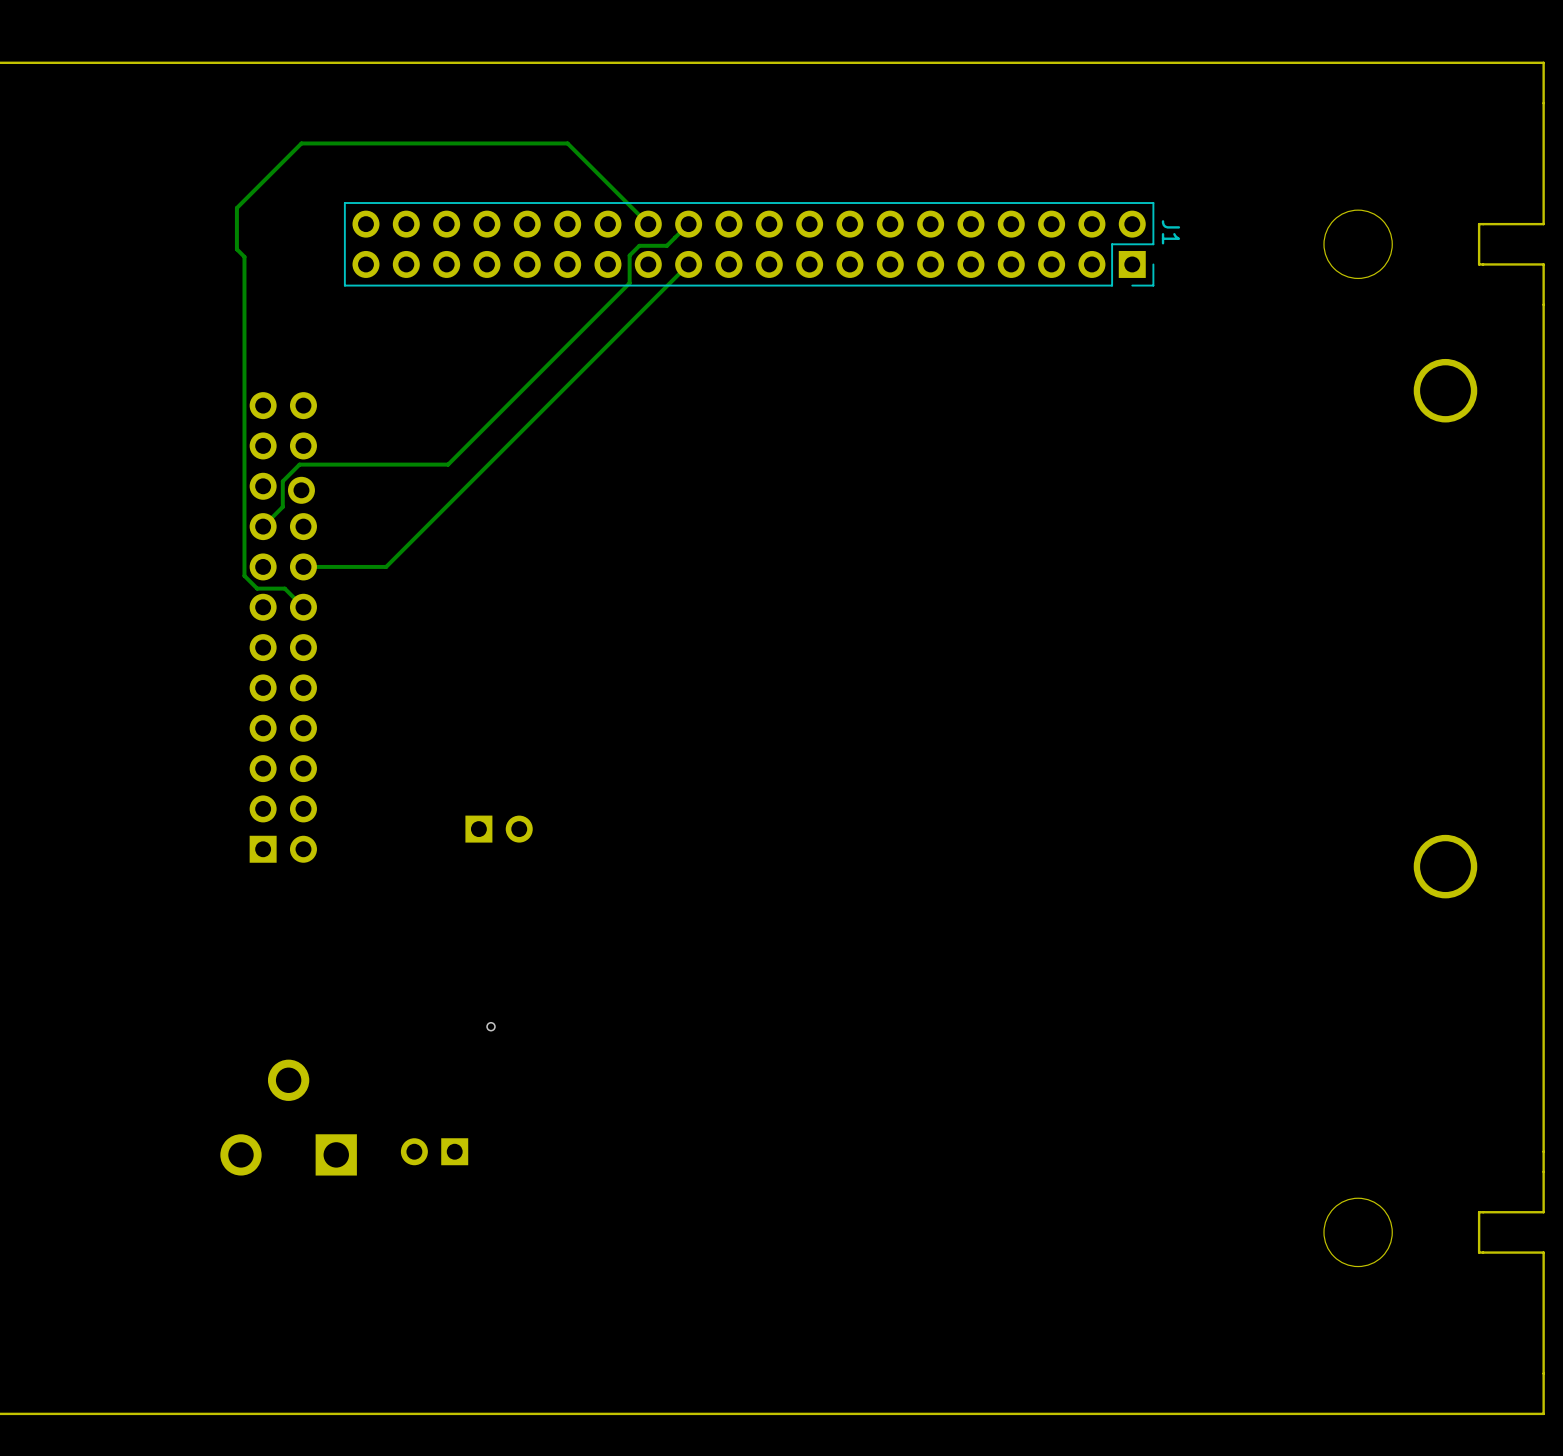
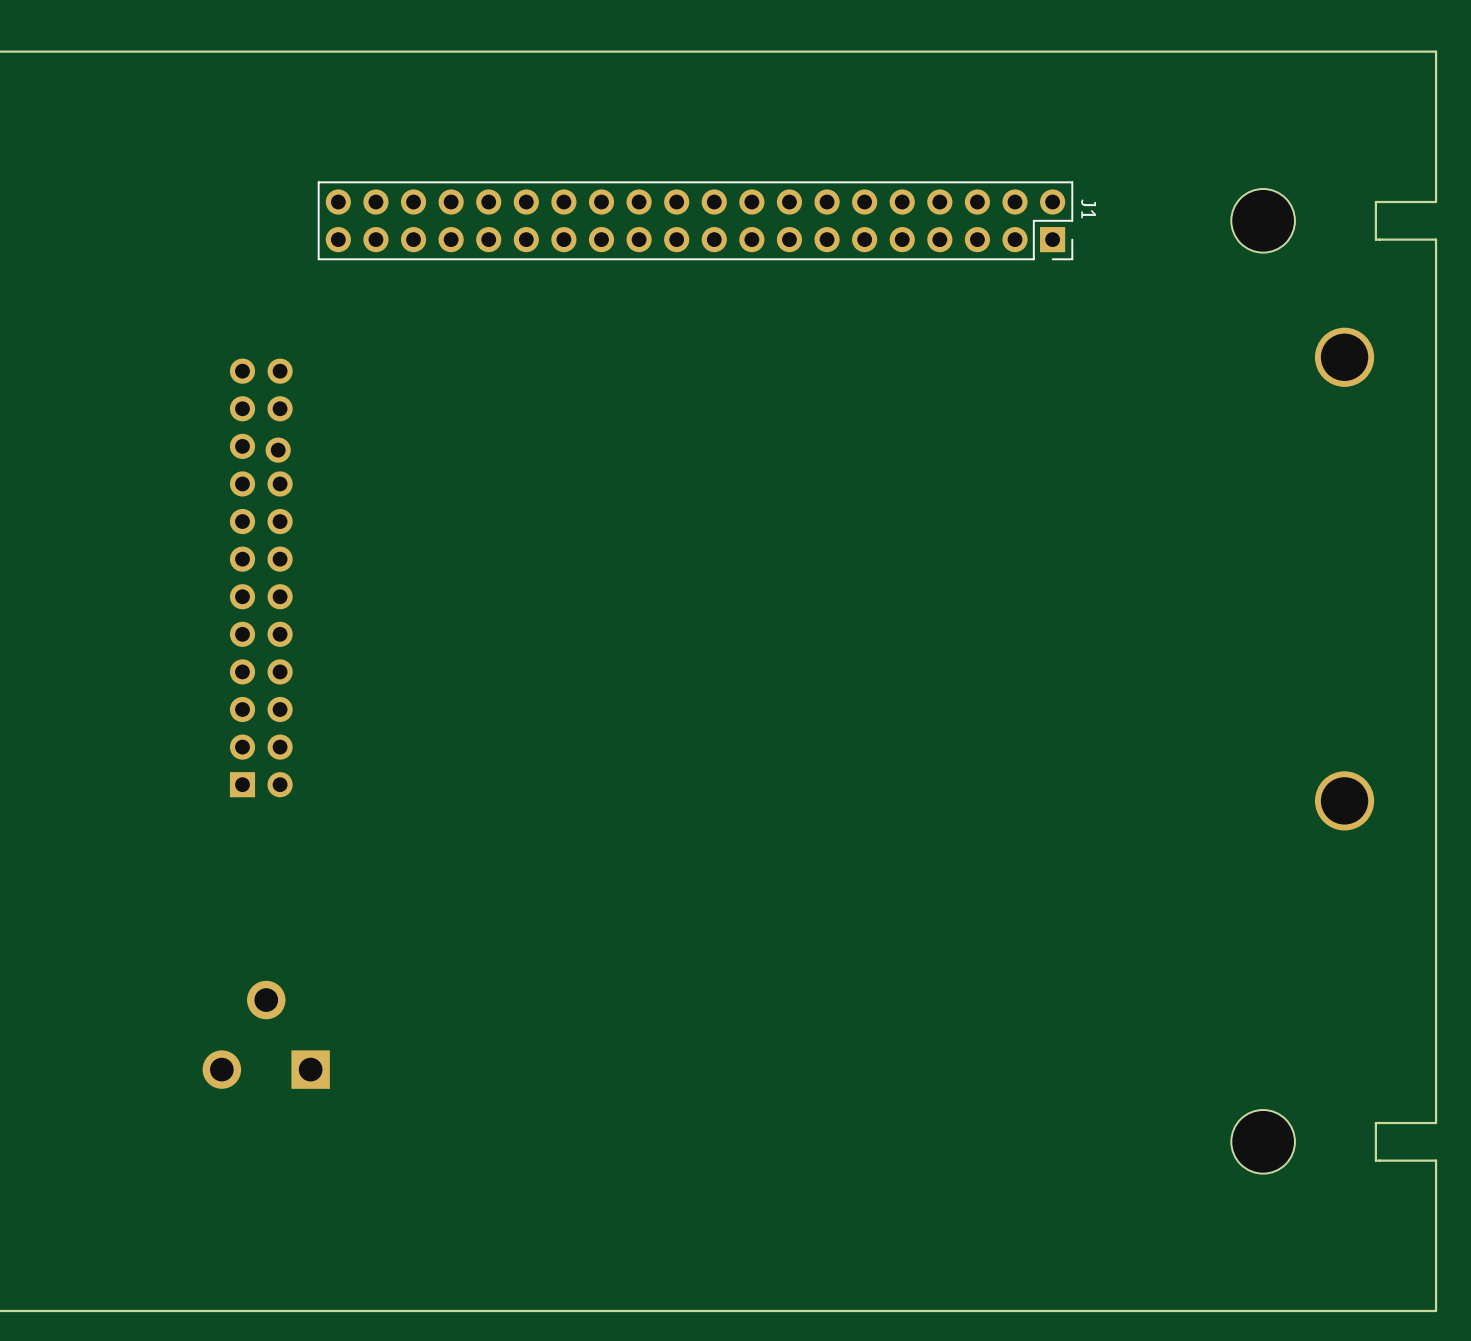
track: (648, 224) (567, 143) (301, 143) (236, 207) (236, 249) (244, 256) (244, 575) (257, 588) (284, 588) (303, 607) -> none
track: (688, 224) (666, 245) (639, 245) (629, 255) (629, 283) (448, 464) (299, 464) (282, 481) (282, 506) (263, 526) -> none
track: (688, 264) (386, 566) (303, 566) -> none
part: (499, 829) -> none
via: (491, 1026) -> none
part: (434, 1151) -> none

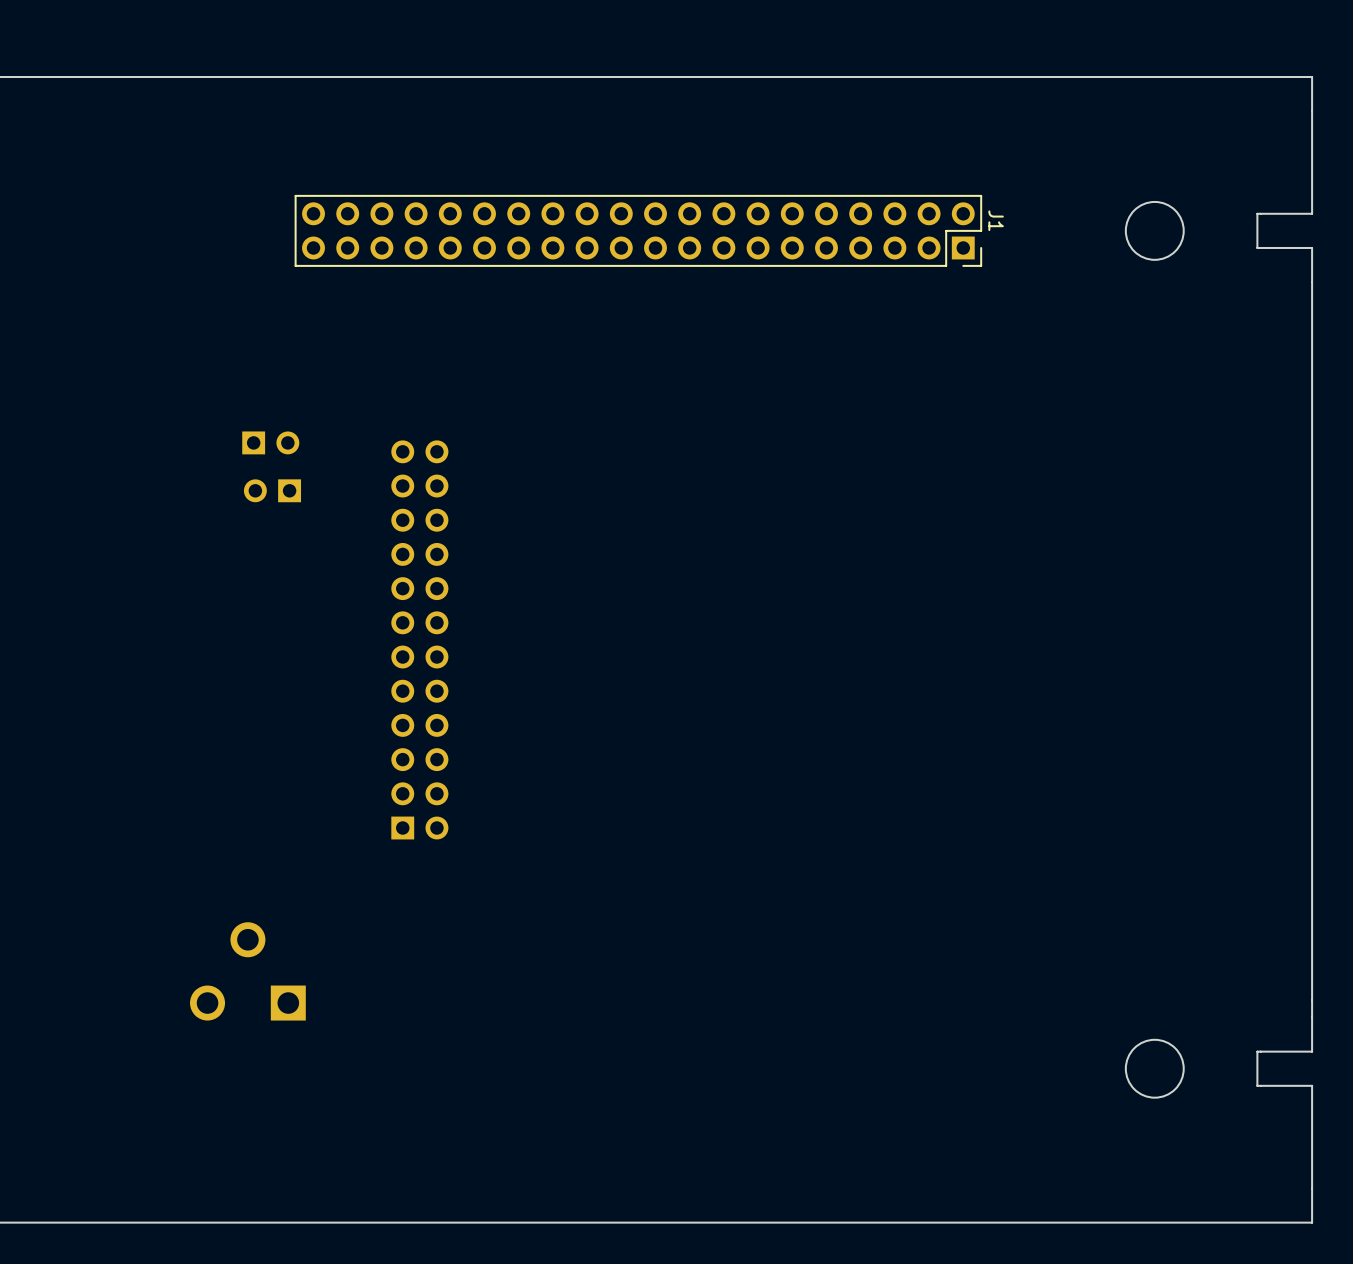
part: (1344, 357) -> none
part: none -> (270, 442)
part: none -> (272, 490)
part: (261, 577) -> none
part: none -> (419, 639)
part: (1344, 800) -> none

